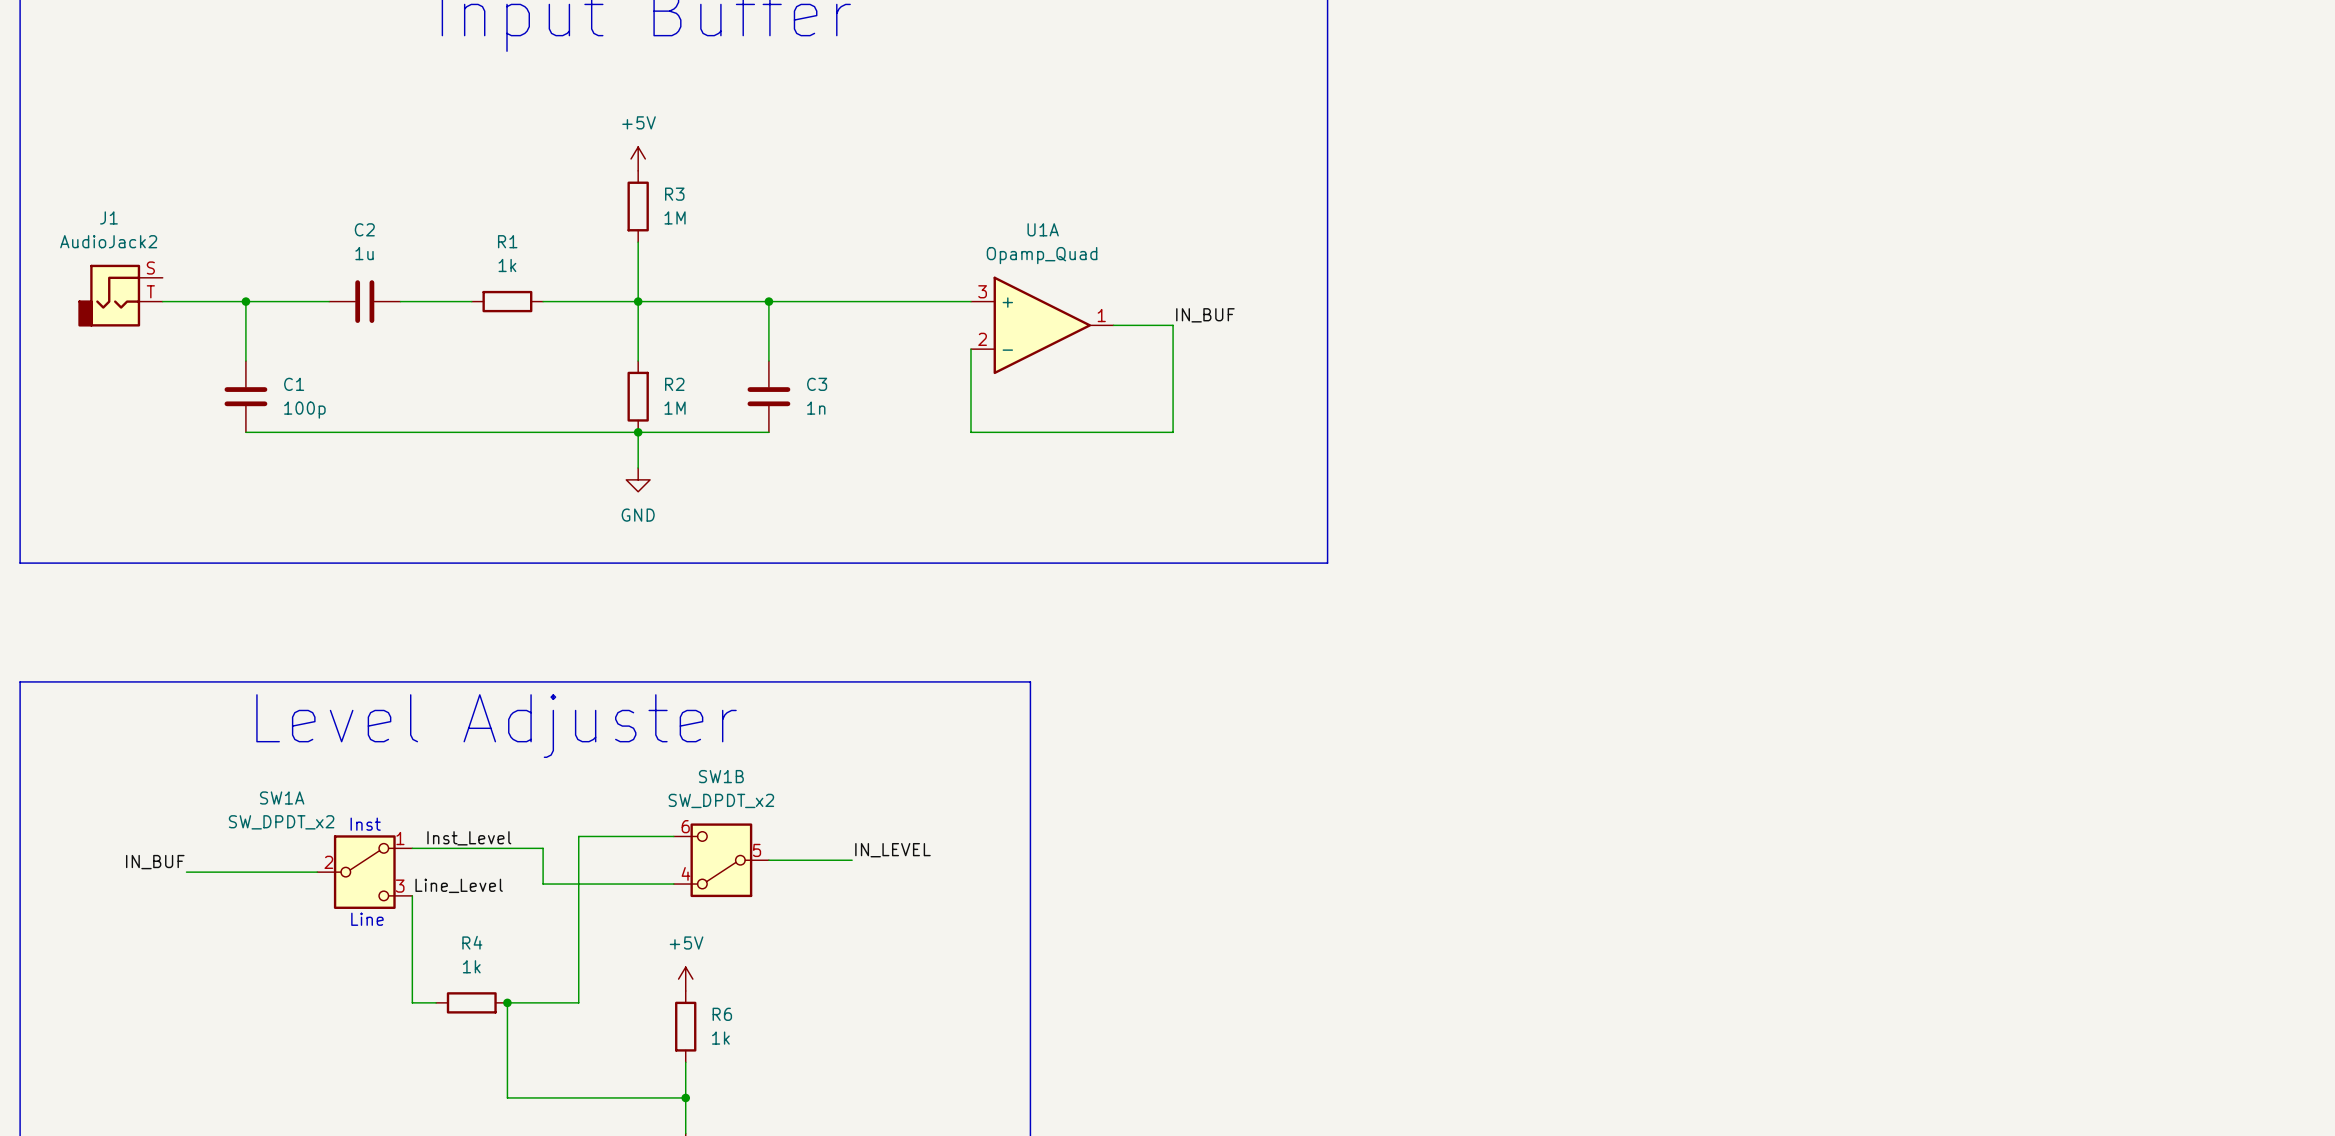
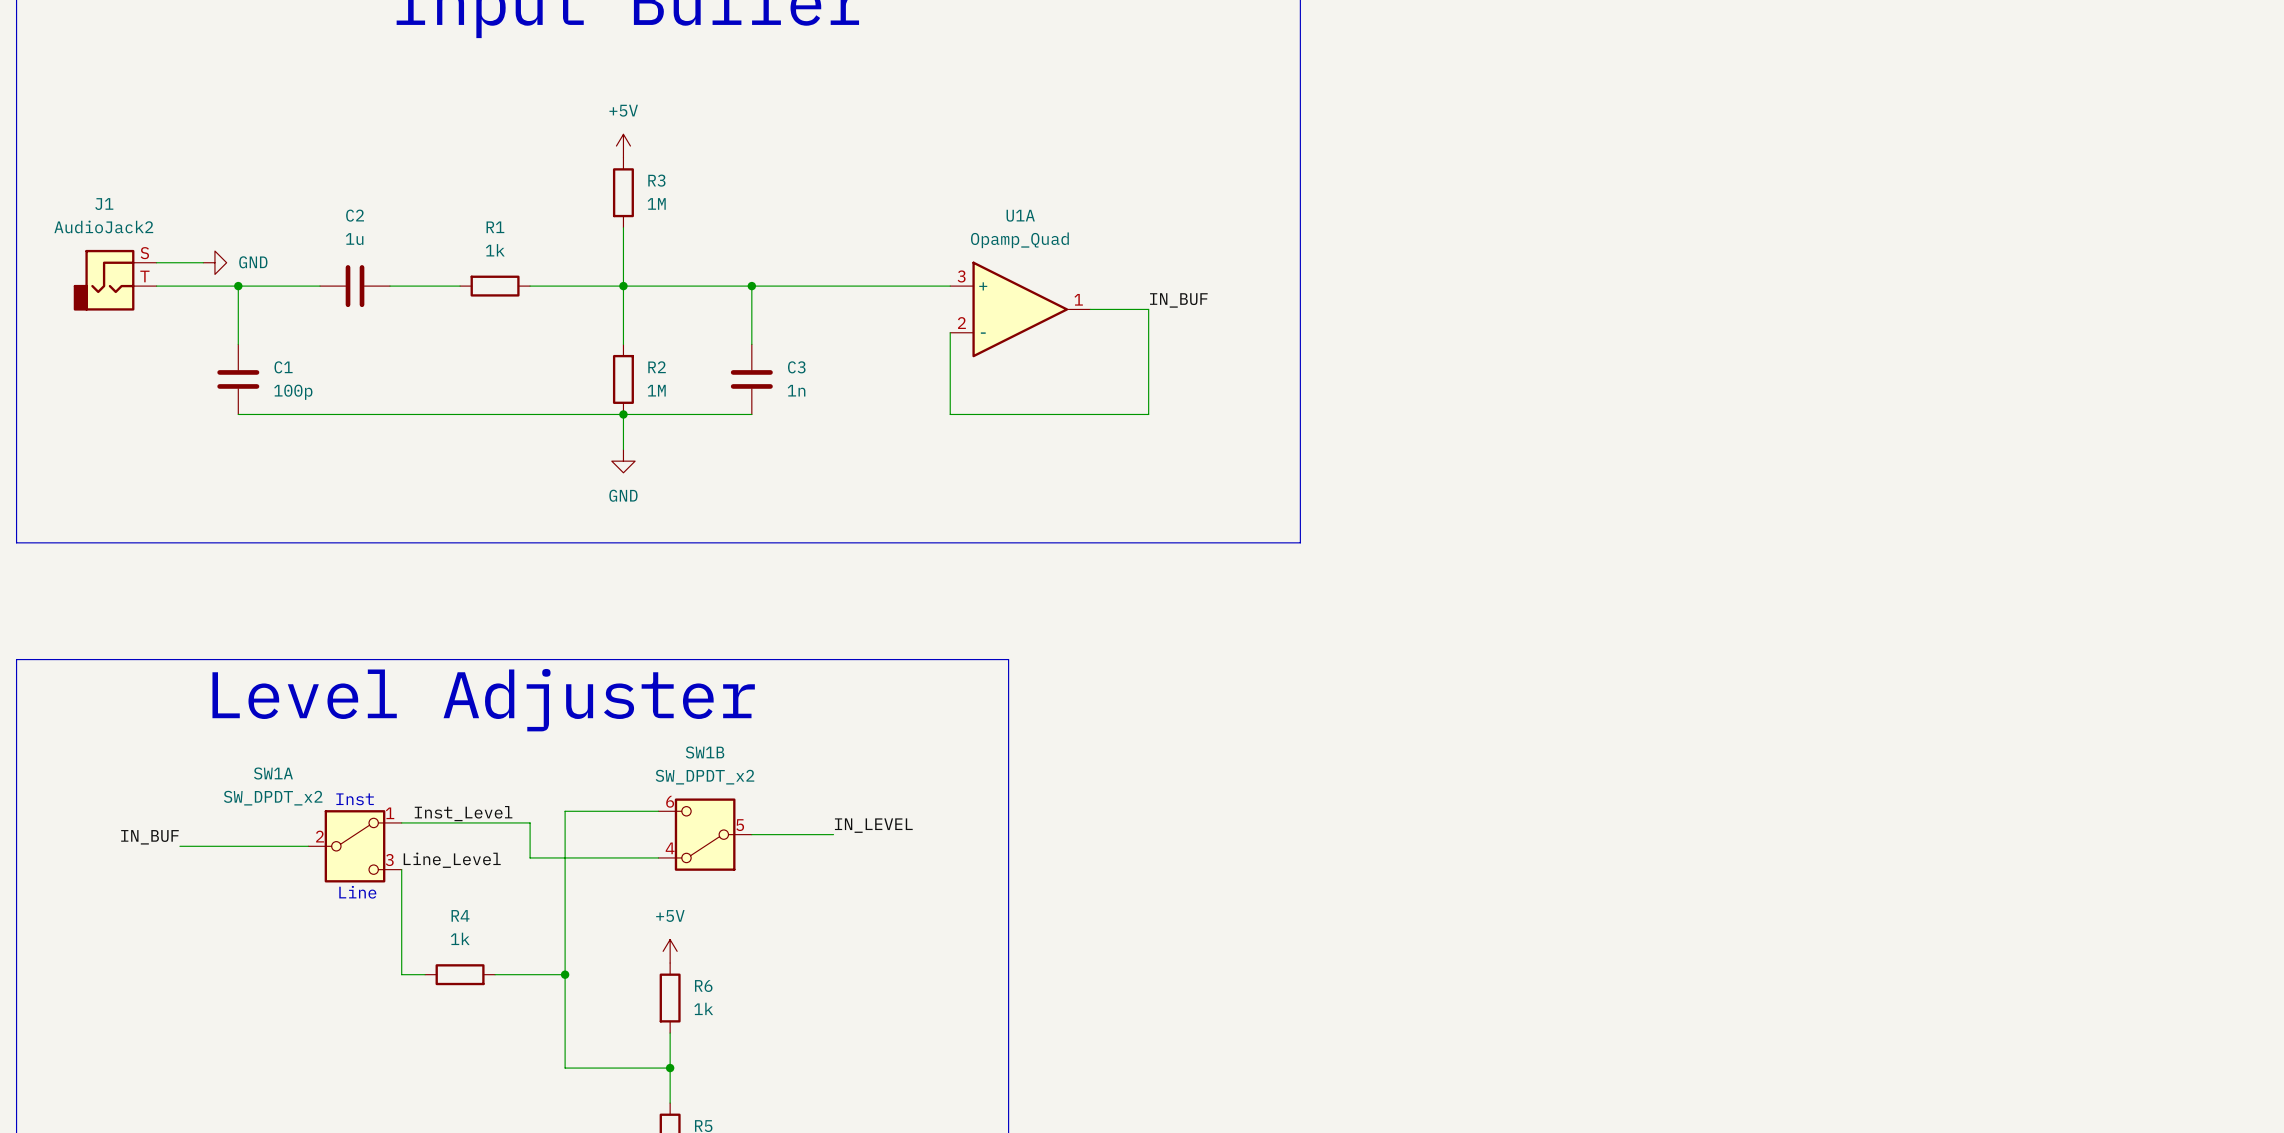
wire: none -> (156, 262) (203, 262)
power symbol: none -> GND (214, 262)
wire: (507, 1002) (507, 1097) (578, 1097) -> (565, 974) (565, 1068)
junction: (507, 1002) -> none
junction: none -> (565, 974)

